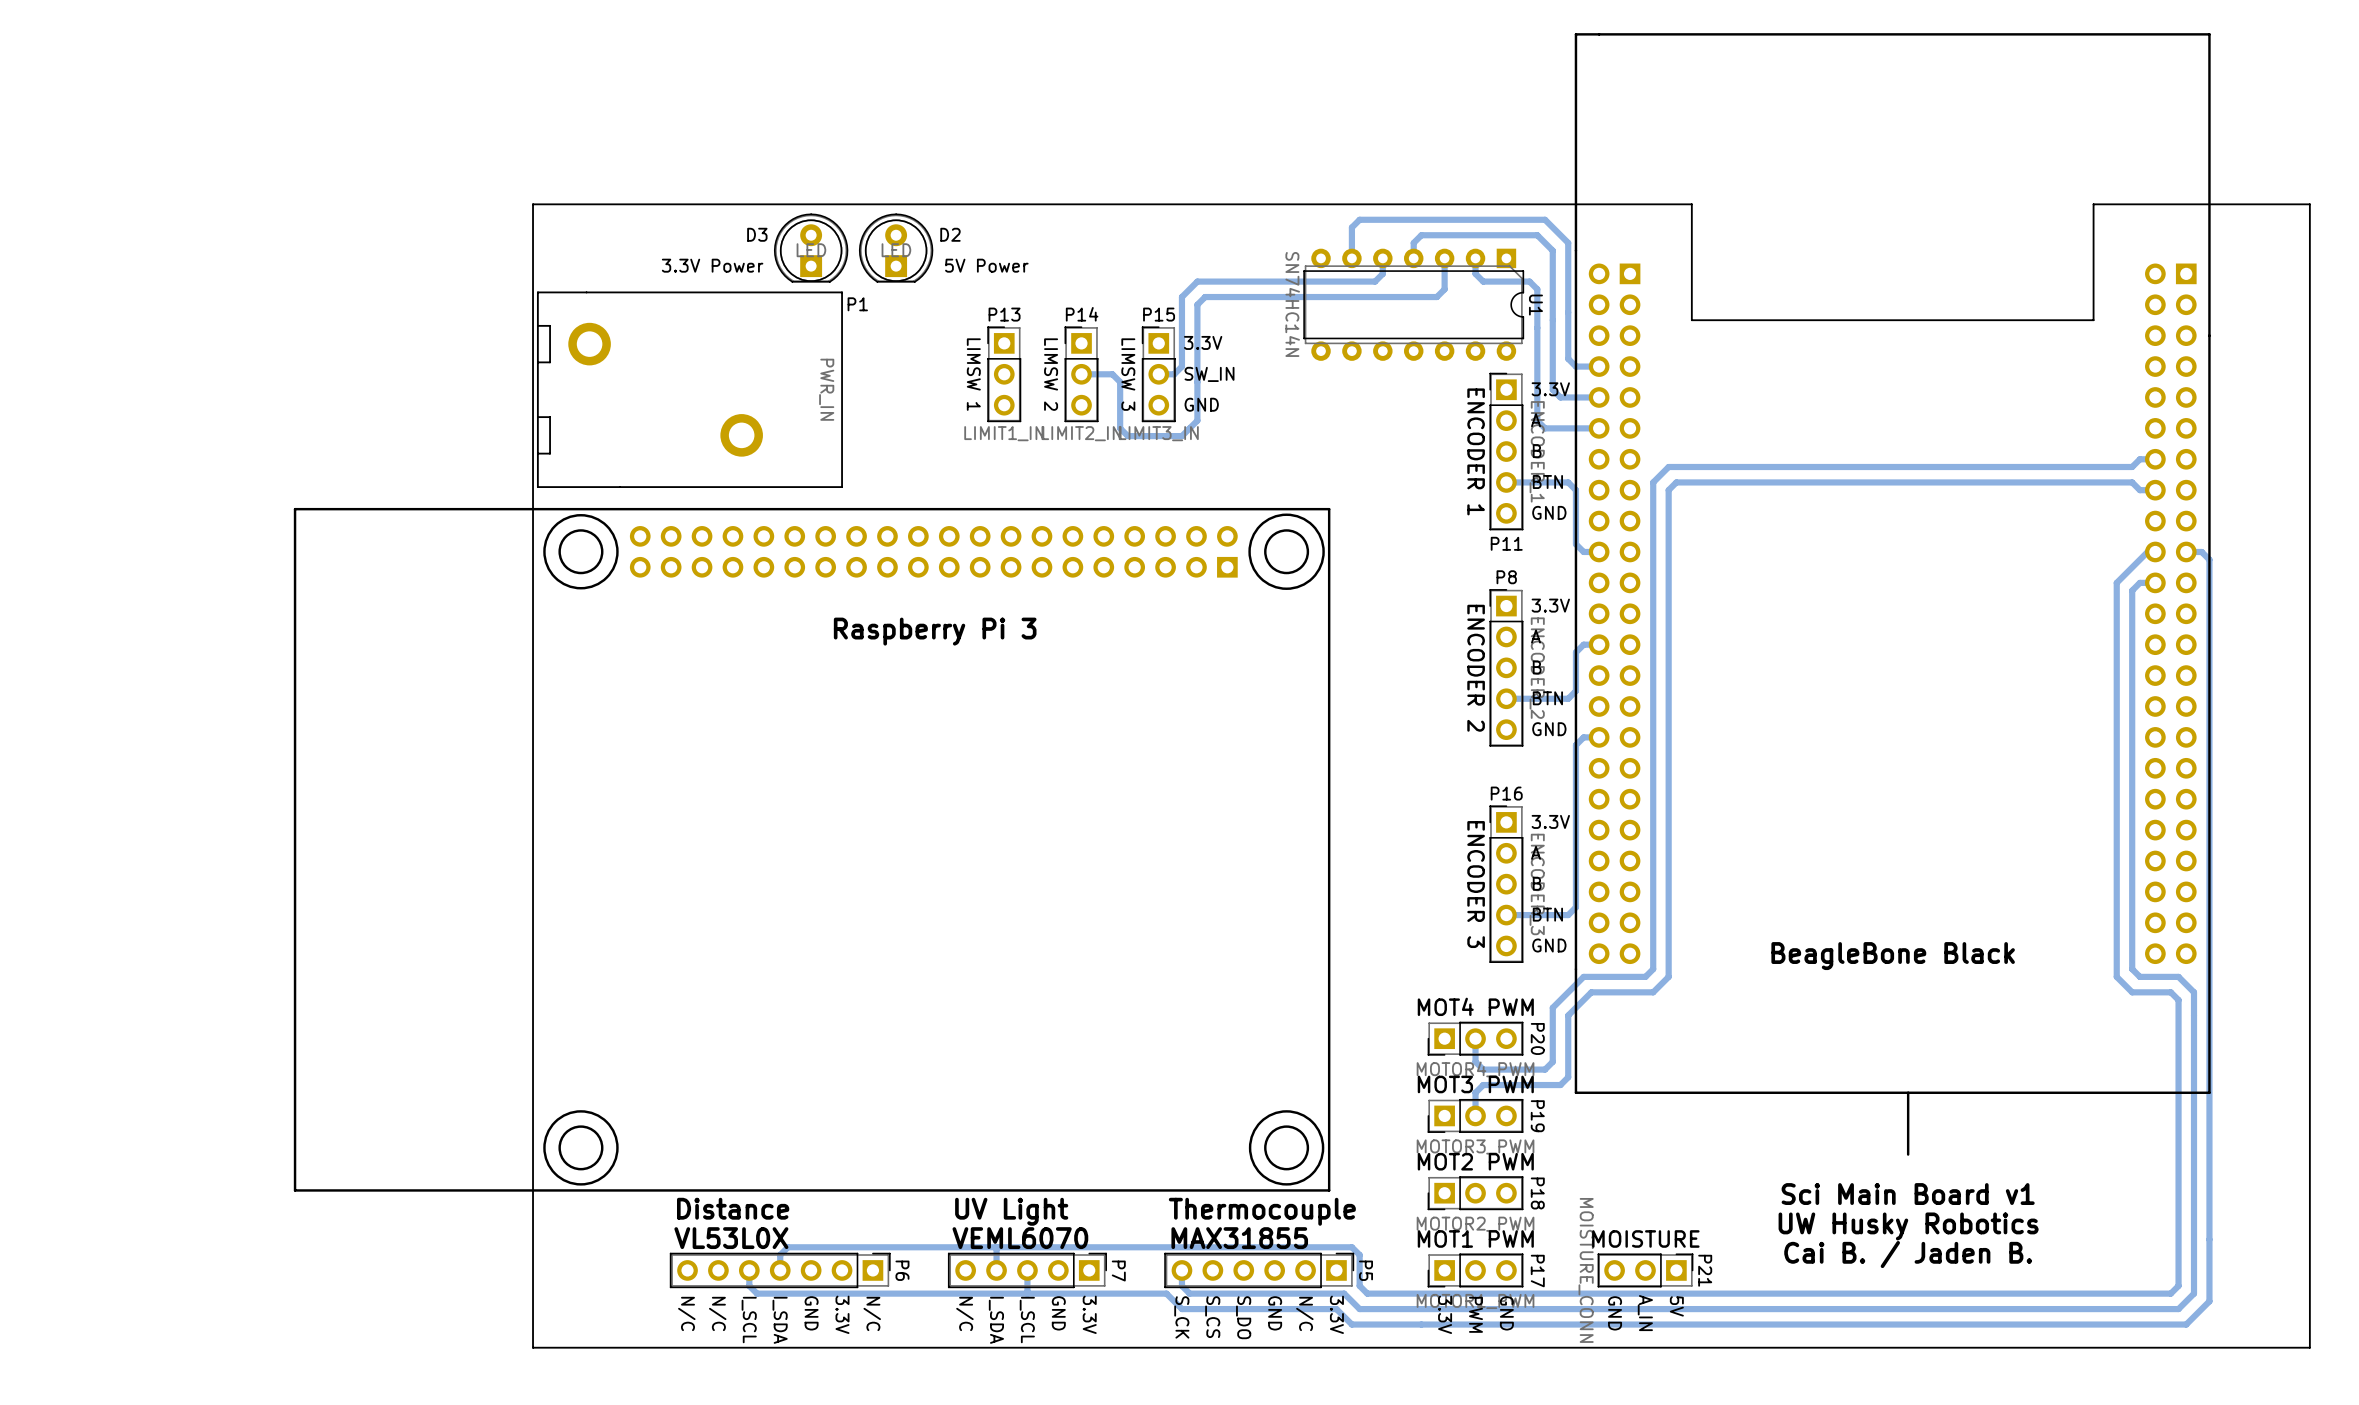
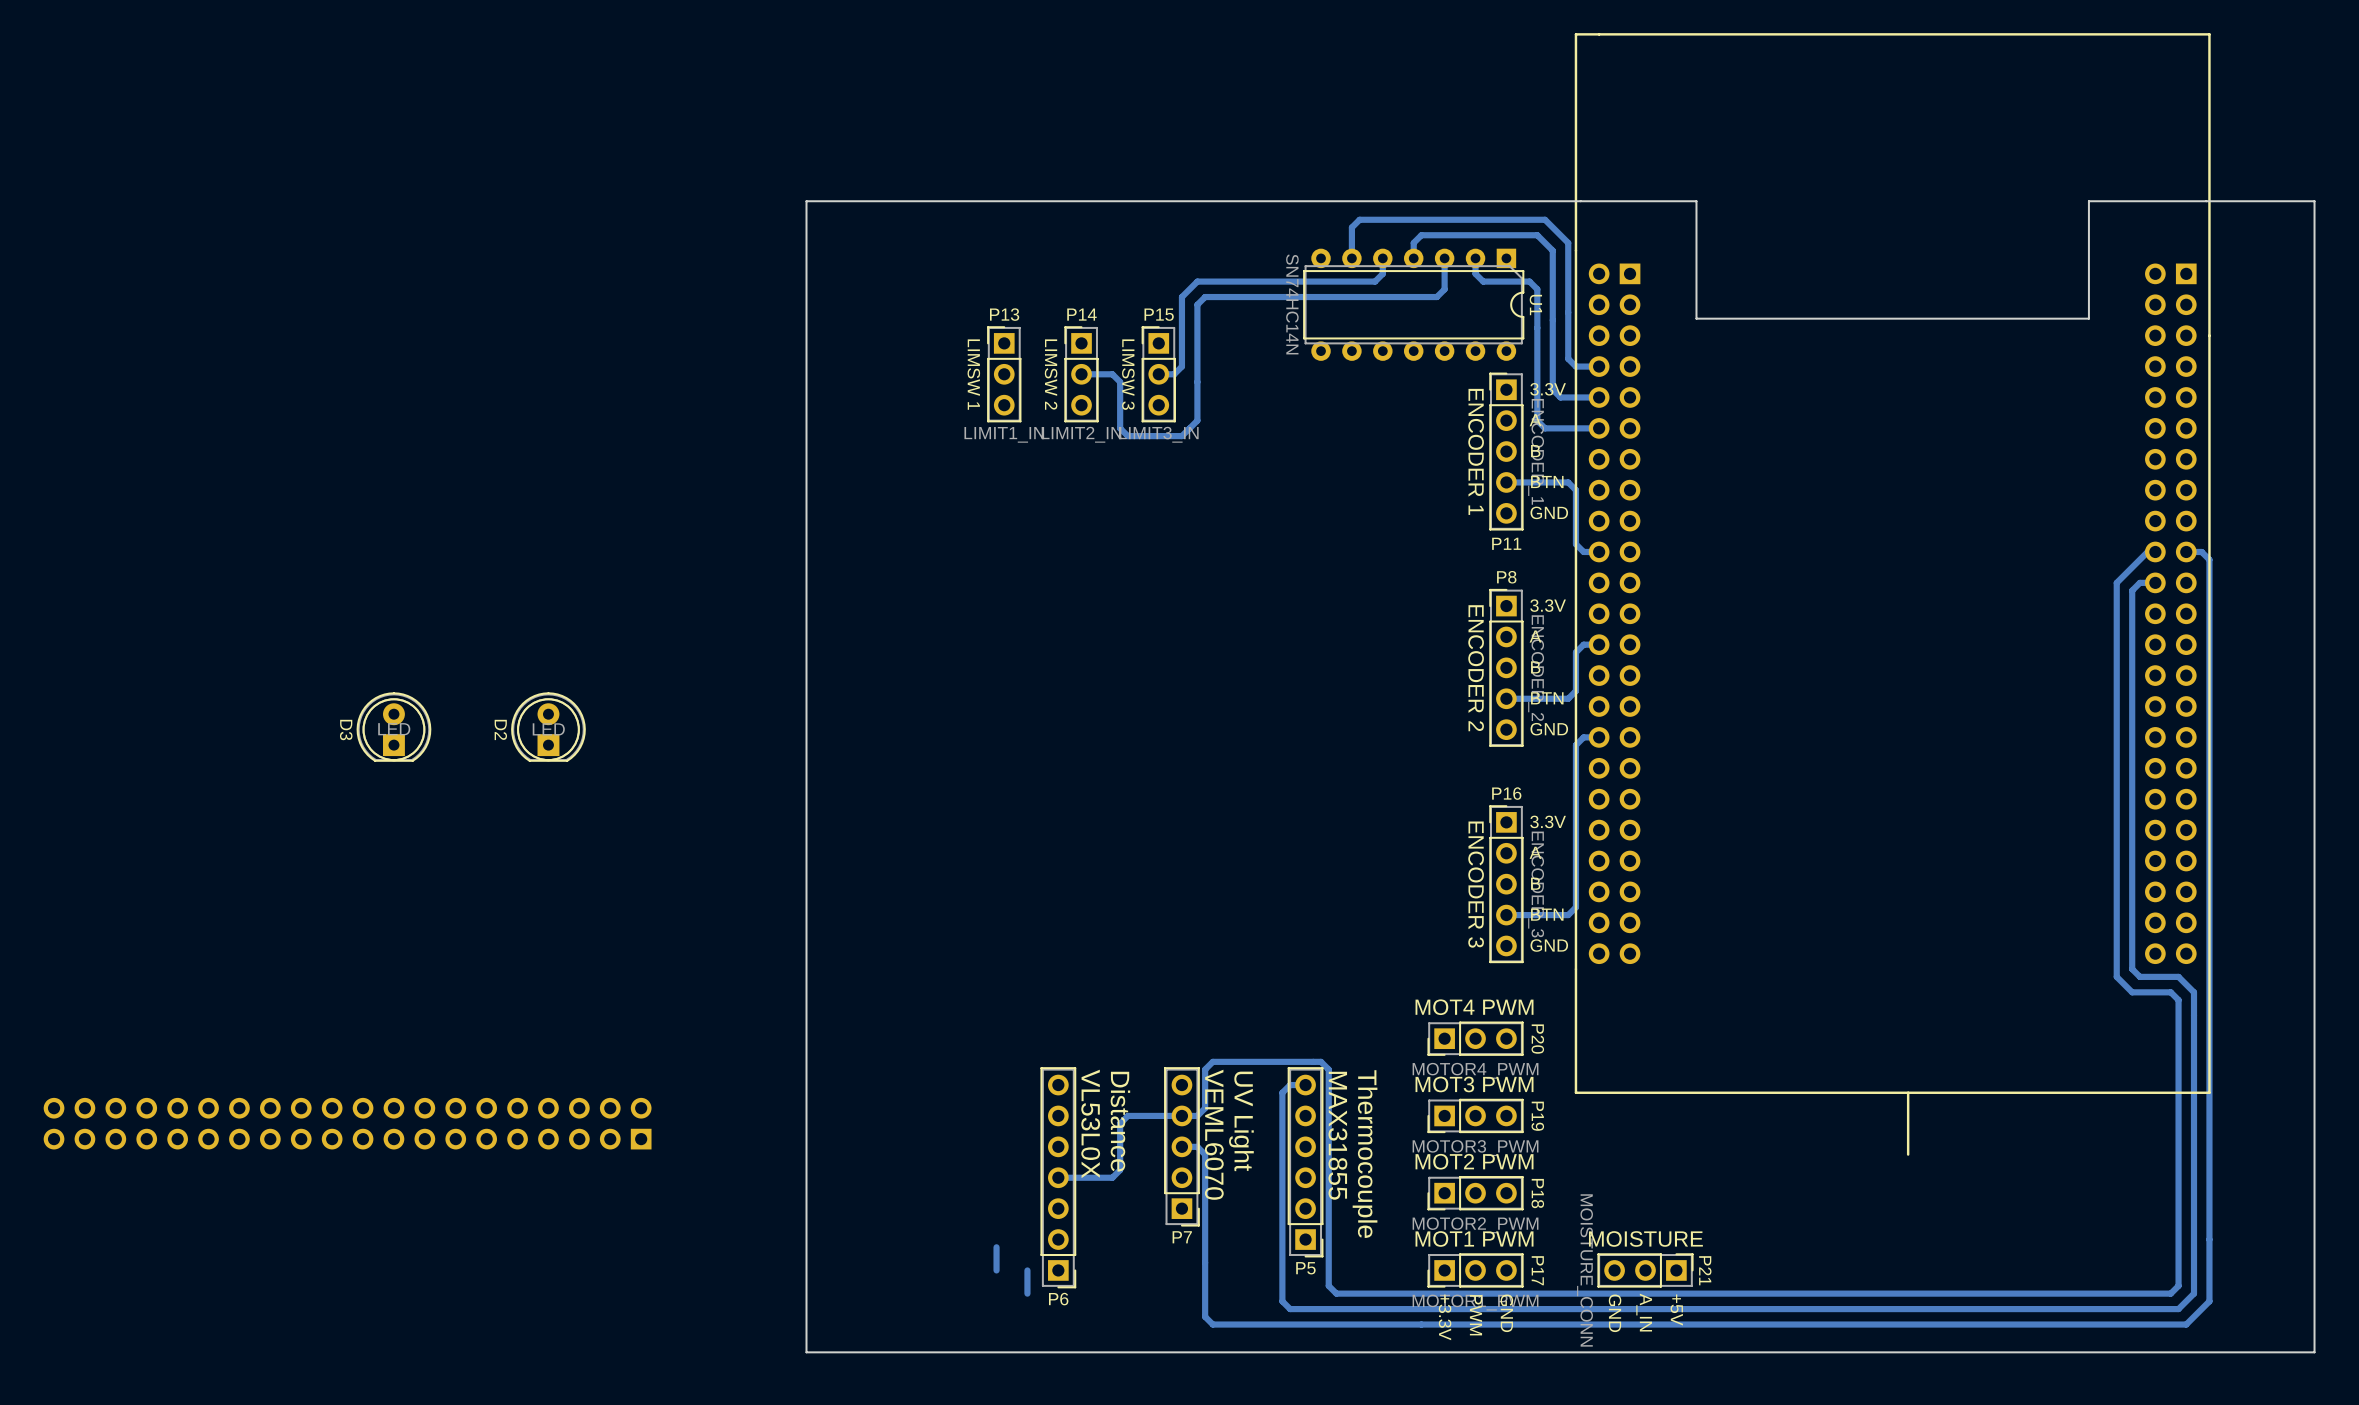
board edge: (2309, 204) (2309, 1347) (533, 1347) (533, 204) (1691, 204) (1691, 320) (2093, 320) (2093, 204) (2309, 204) -> (2314, 201) (2314, 1352) (806, 1352) (806, 201) (1696, 201) (1696, 318) (2088, 318) (2088, 201) (2314, 201)
D3 name rotation: 0° (757, 234) -> 90° clockwise (346, 730)
D2 name rotation: 0° (950, 234) -> 90° clockwise (500, 729)
D2 name position: D2 (950, 234) -> D2 (500, 729)
D3 position: (811, 248) -> (393, 727)
D2 position: (896, 248) -> (548, 727)
text: 3.3V Power (712, 265) -> none
text: 5V Power (986, 265) -> none
text: 3.3V (1203, 342) -> none
text: SW_IN (1209, 374) -> none
P1: PWR_IN (689, 389) -> none
text: GND (1201, 404) -> none
track: (2155, 459) (2139, 459) (2132, 467) (1668, 467) (1653, 482) (1653, 969) (1645, 976) (1583, 976) (1552, 1007) (1552, 1061) (1545, 1069) (1483, 1069) (1475, 1061) (1475, 1038) -> none
track: (2155, 490) (2139, 490) (2132, 482) (1676, 482) (1668, 490) (1668, 976) (1653, 992) (1591, 992) (1568, 1015) (1568, 1077) (1560, 1085) (1483, 1085) (1475, 1092) (1475, 1115) -> none
line: (1329, 509) (1329, 1190) (295, 1190) (295, 509) (1329, 509) -> none
drawing: [1248, 513, 1325, 590] -> none
drawing: [543, 514, 619, 590] -> none
part: (933, 551) -> none
text: Raspberry Pi 3 (935, 631) -> none
text: BeagleBone Black (1893, 956) -> none
drawing: [543, 1110, 619, 1186] -> none
drawing: [1248, 1110, 1325, 1186] -> none
part: none -> (347, 1123)
text: none -> VL53L0X (1090, 1123)
text: none -> Distance (1120, 1121)
text: none -> UV Light (1241, 1121)
text: none -> VEML6070 (1214, 1134)
track: none -> (1181, 1146) (1197, 1146) (1205, 1154) (1205, 1316) (1212, 1324) (1351, 1324)
text: Sci Main Board v1 (1908, 1194) -> none
text: Distance (733, 1208) -> none
text: UV Light (1011, 1211) -> none
text rotation: 0° (1262, 1211) -> 90° clockwise (1365, 1154)
text: UW Husky Robotics (1908, 1226) -> none
text: VL53L0X (731, 1238) -> none
text: VEML6070 (1020, 1238) -> none
text rotation: 0° (1239, 1238) -> 90° clockwise (1337, 1135)
text: Cai B. / Jaden B. (1908, 1254) -> none
track: (749, 1270) (749, 1285) (757, 1293) (1166, 1293) (1181, 1309) (1290, 1309) -> (1305, 1085) (1290, 1085) (1282, 1092) (1282, 1301) (1290, 1309)
track: (780, 1270) (780, 1255) (787, 1247) (1351, 1247) (1359, 1255) (1359, 1285) (1367, 1293) -> none
P6 rotation: 0° (780, 1270) -> 90° clockwise (1058, 1177)
P6 position: (780, 1270) -> (1058, 1177)
P7 rotation: 0° (1027, 1270) -> 90° clockwise (1181, 1146)
P7 position: (1027, 1270) -> (1181, 1146)
track: (1181, 1270) (1181, 1285) (1189, 1293) (1336, 1293) -> (1058, 1177) (1112, 1177) (1120, 1170) (1120, 1123) (1127, 1115) (1197, 1115) (1205, 1108) (1205, 1069) (1212, 1061) (1321, 1061) (1328, 1069) (1328, 1285) (1336, 1293)
P5 rotation: 0° (1259, 1270) -> 90° clockwise (1305, 1162)
P5 position: (1259, 1270) -> (1305, 1162)
track: (1344, 1293) (1359, 1309) -> (1344, 1293) (1367, 1293)
text: 5V (1676, 1306) -> +5V (1676, 1310)
track: (1336, 1309) (1351, 1324) -> (1336, 1309) (1359, 1309)
text: N/C (686, 1313) -> none
text: N/C (717, 1313) -> none
text: GND (811, 1313) -> none
text: N/C (872, 1313) -> none
text: N/C (964, 1313) -> none
text: GND (1058, 1313) -> none
text: GND (1275, 1313) -> none
text: N/C (1304, 1313) -> none
text: 3.3V (842, 1314) -> none
text: 3.3V (1089, 1314) -> none
text: 3.3V (1336, 1314) -> none
text: 3.3V (1445, 1314) -> +3.3V (1445, 1317)
text: S_CK (1181, 1317) -> none
text: S_CS (1212, 1317) -> none
text: S_DO (1243, 1317) -> none
text: I_SCL (749, 1320) -> none
text: I_SDA (780, 1320) -> none
text: I_SDA (996, 1320) -> none
text: I_SCL (1027, 1320) -> none

